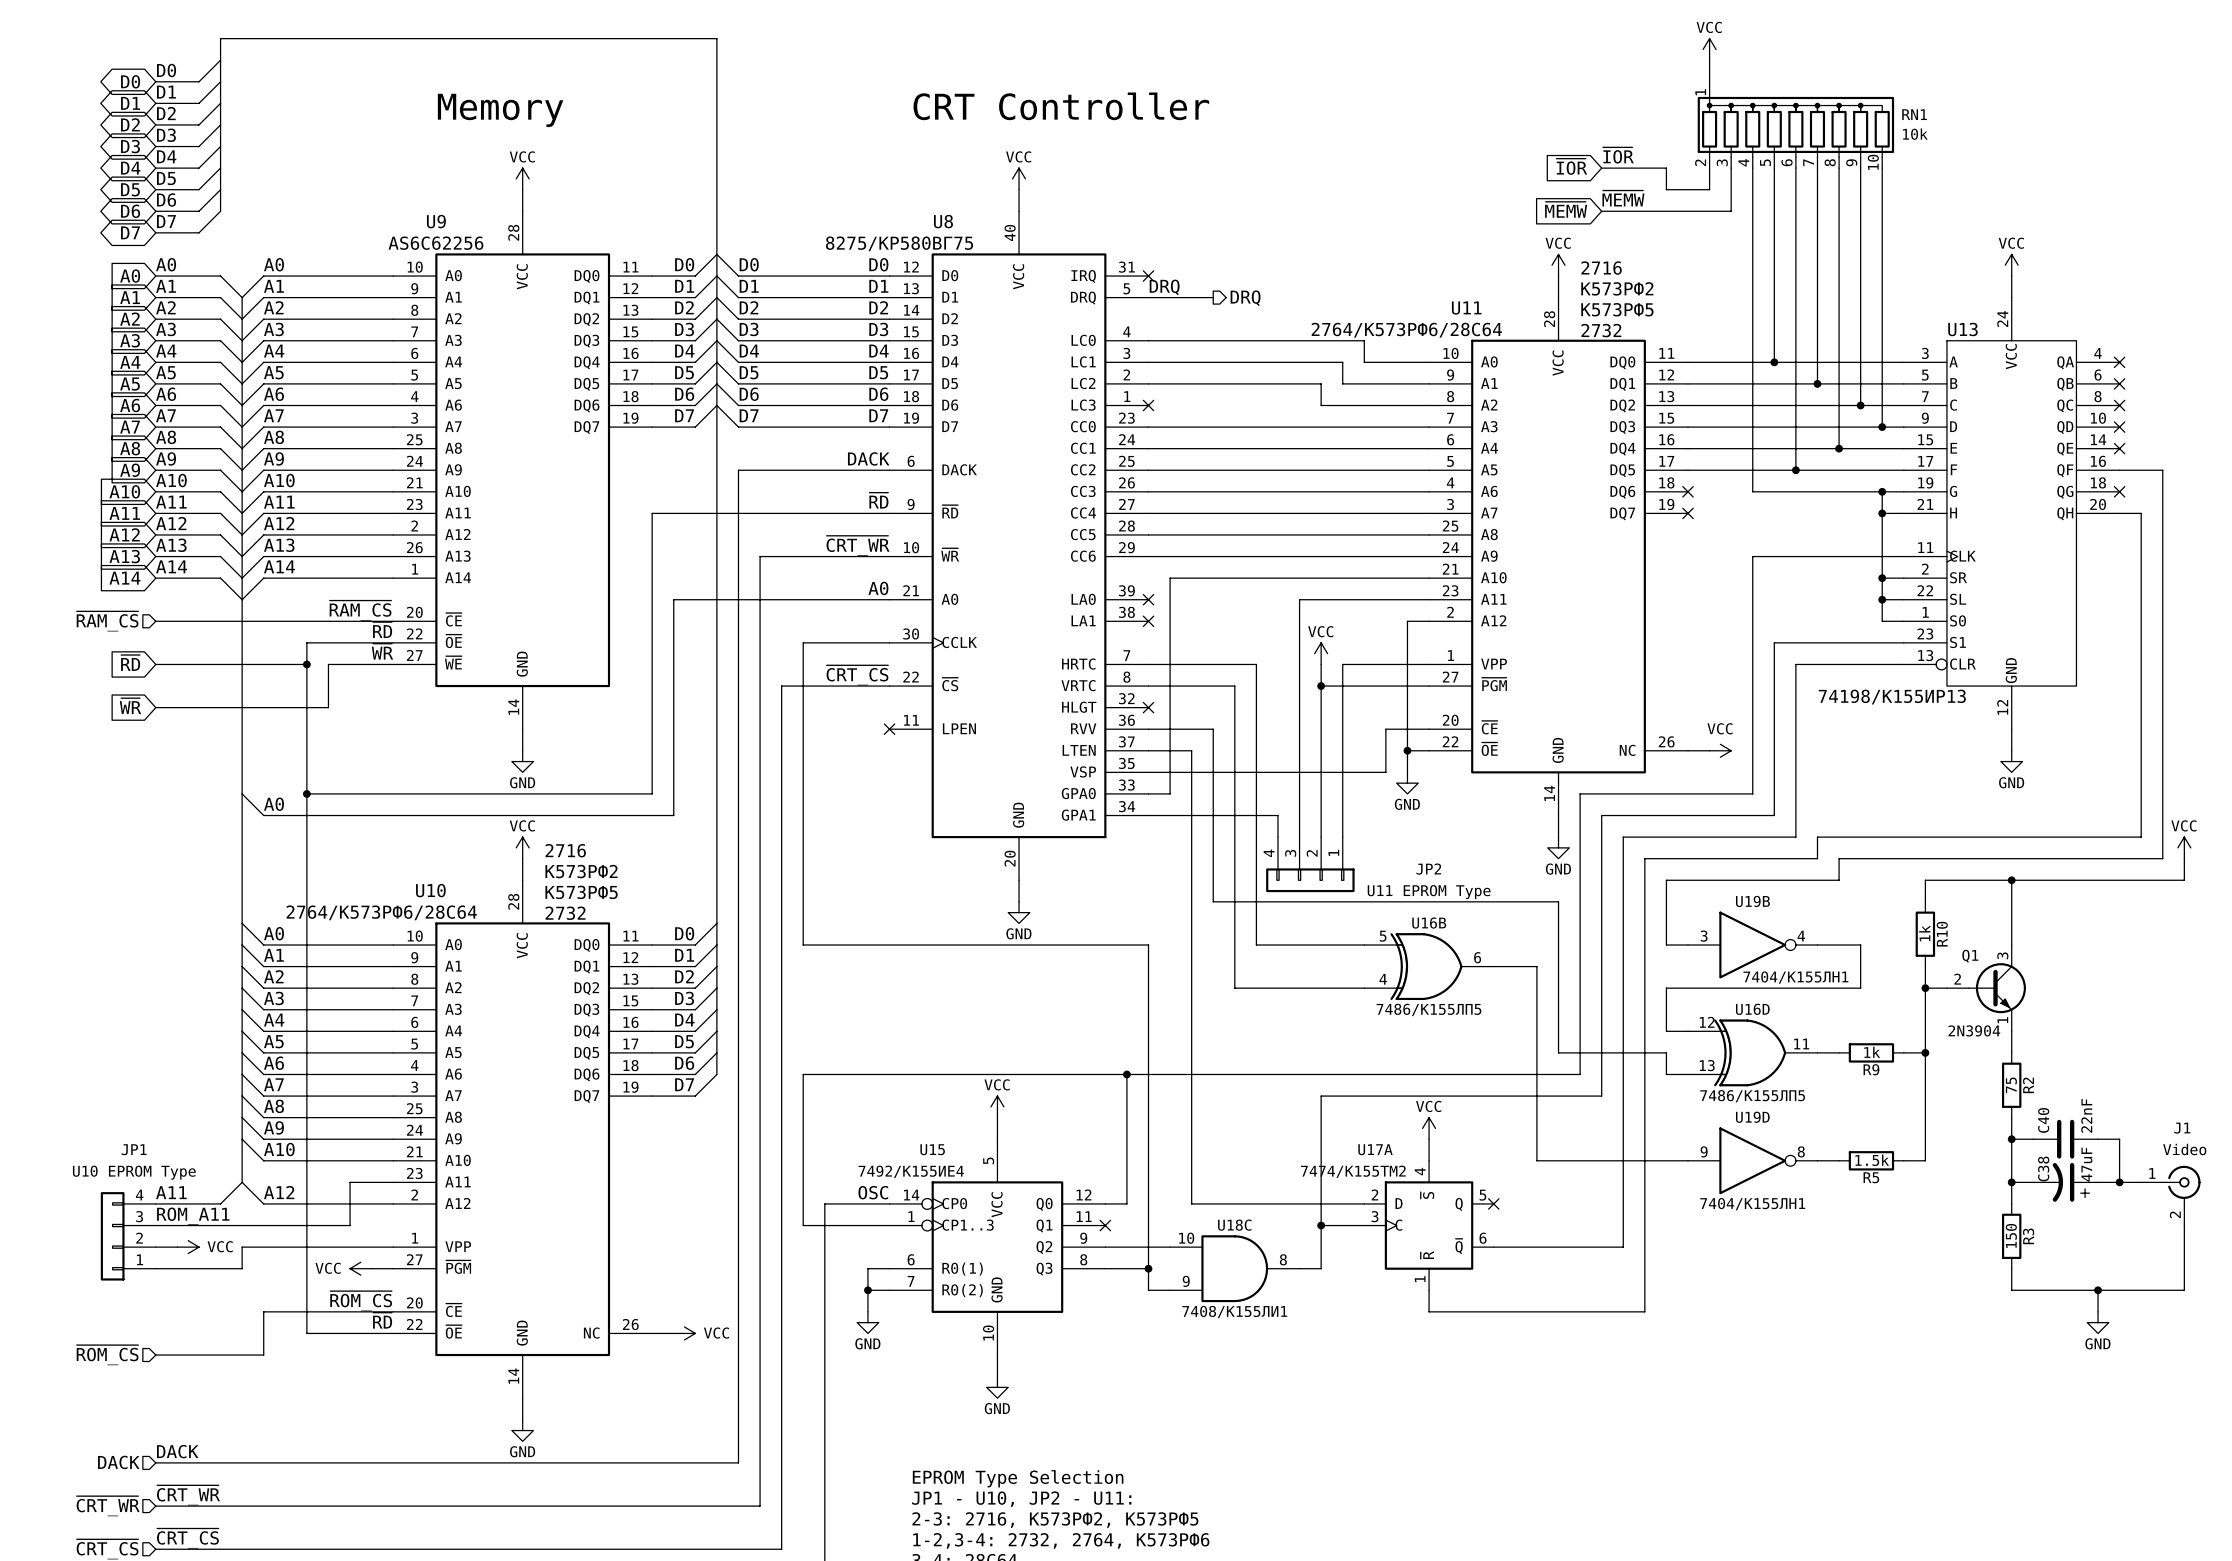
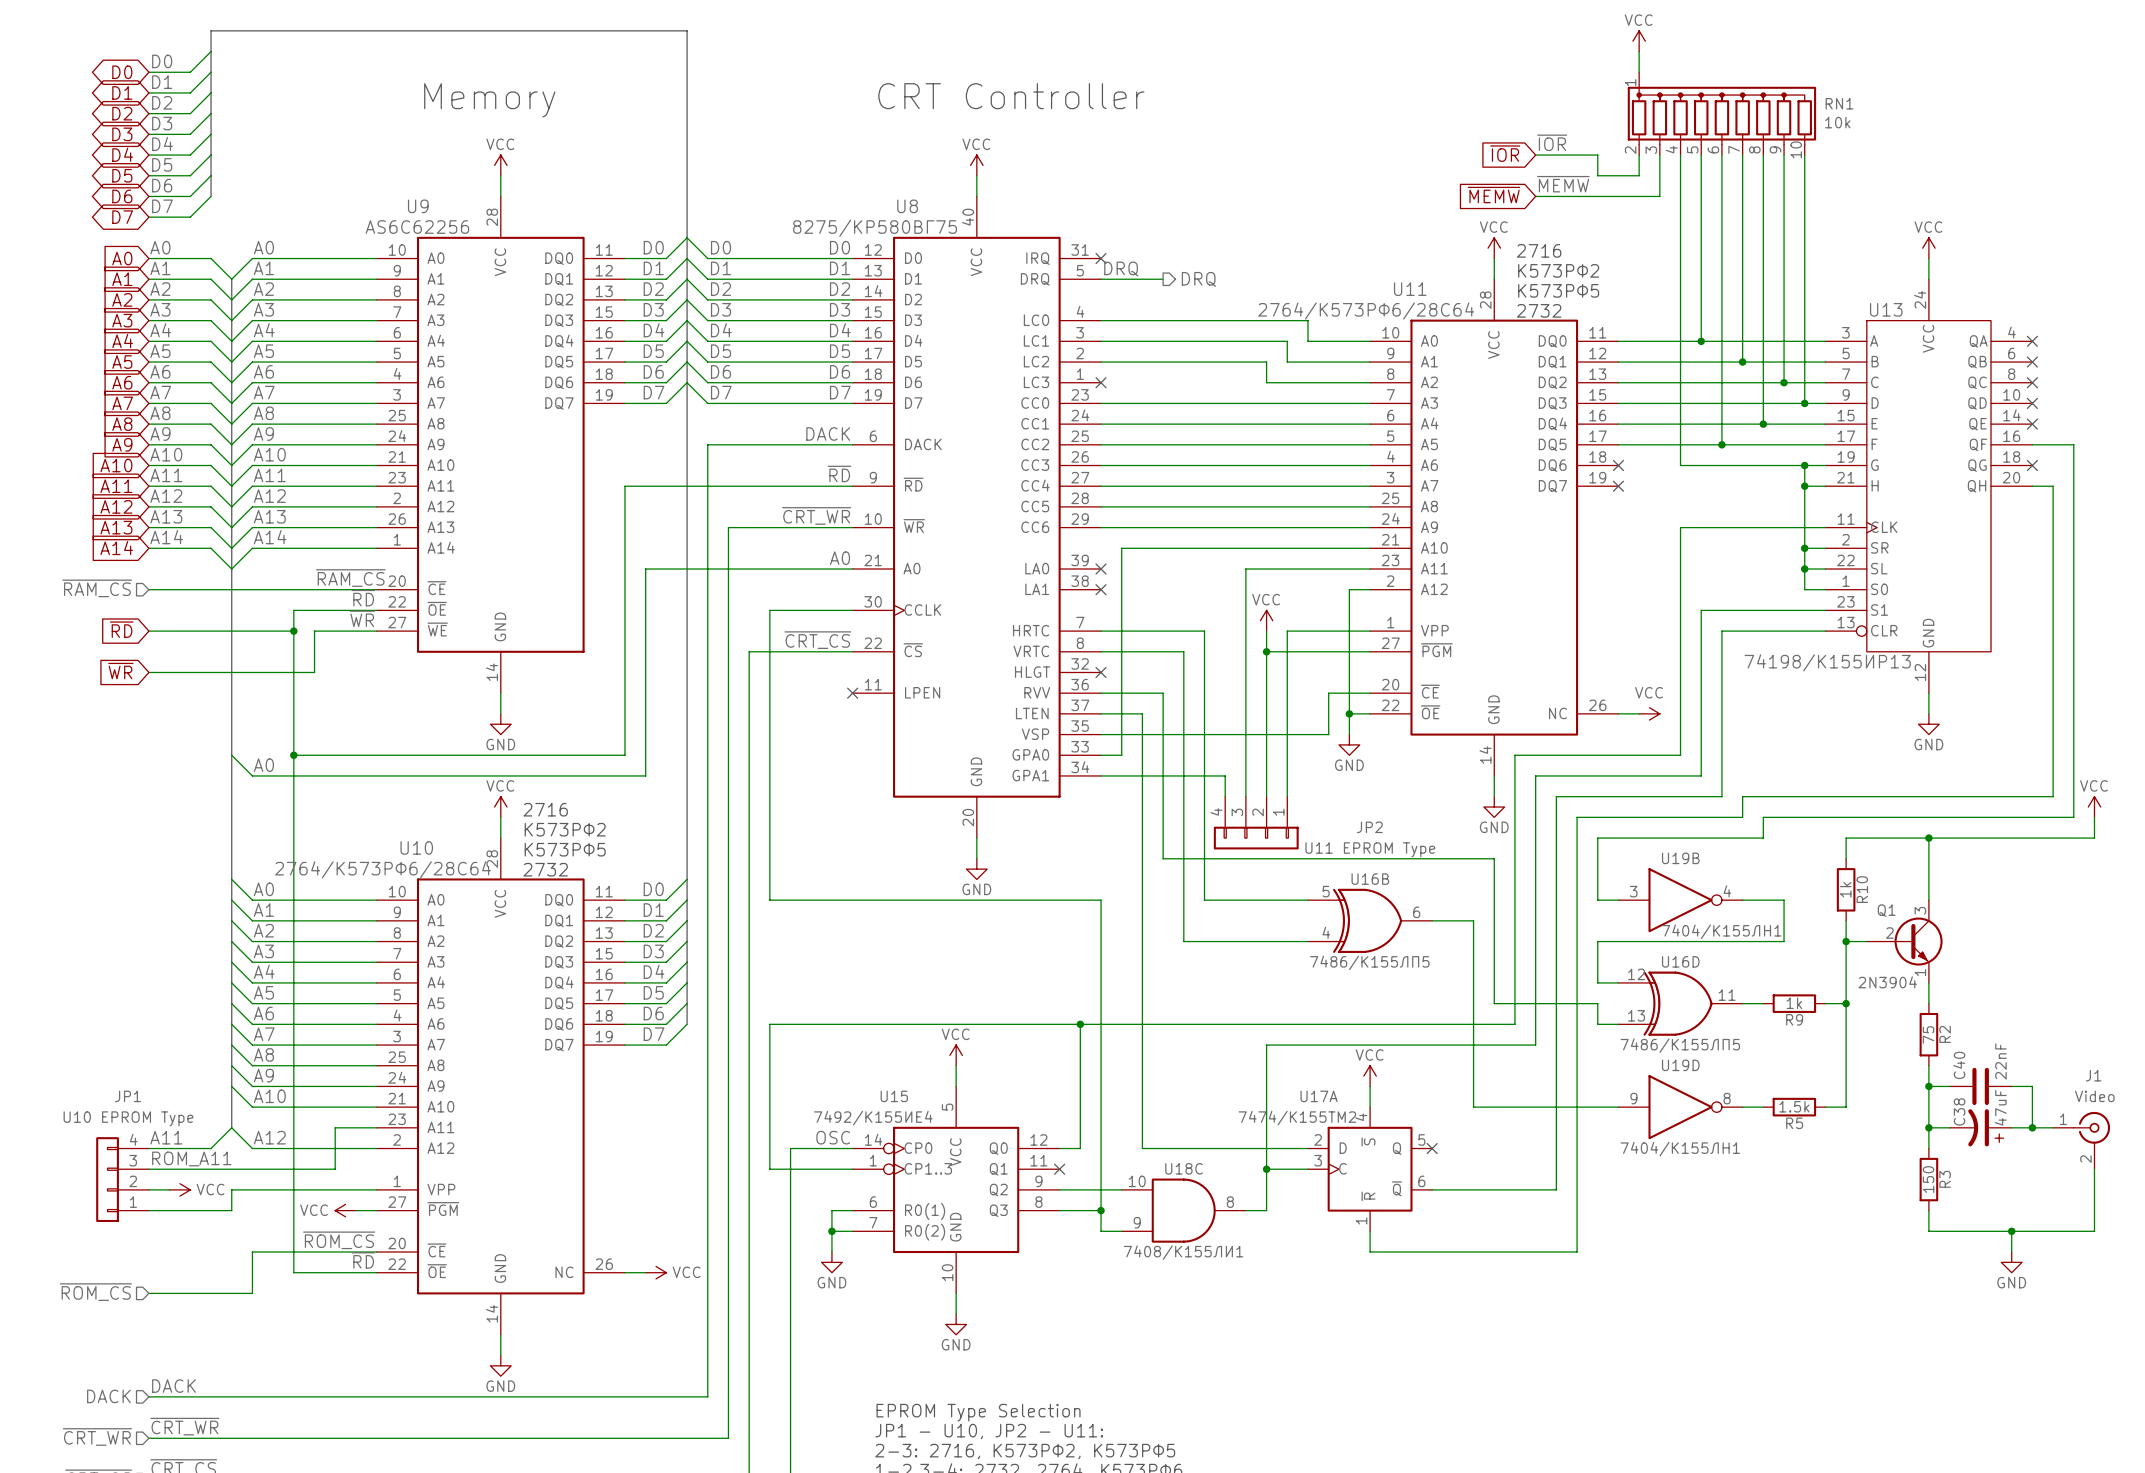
Q1 symbol: [1946, 945, 2026, 1032] -> [1866, 900, 1943, 983]

